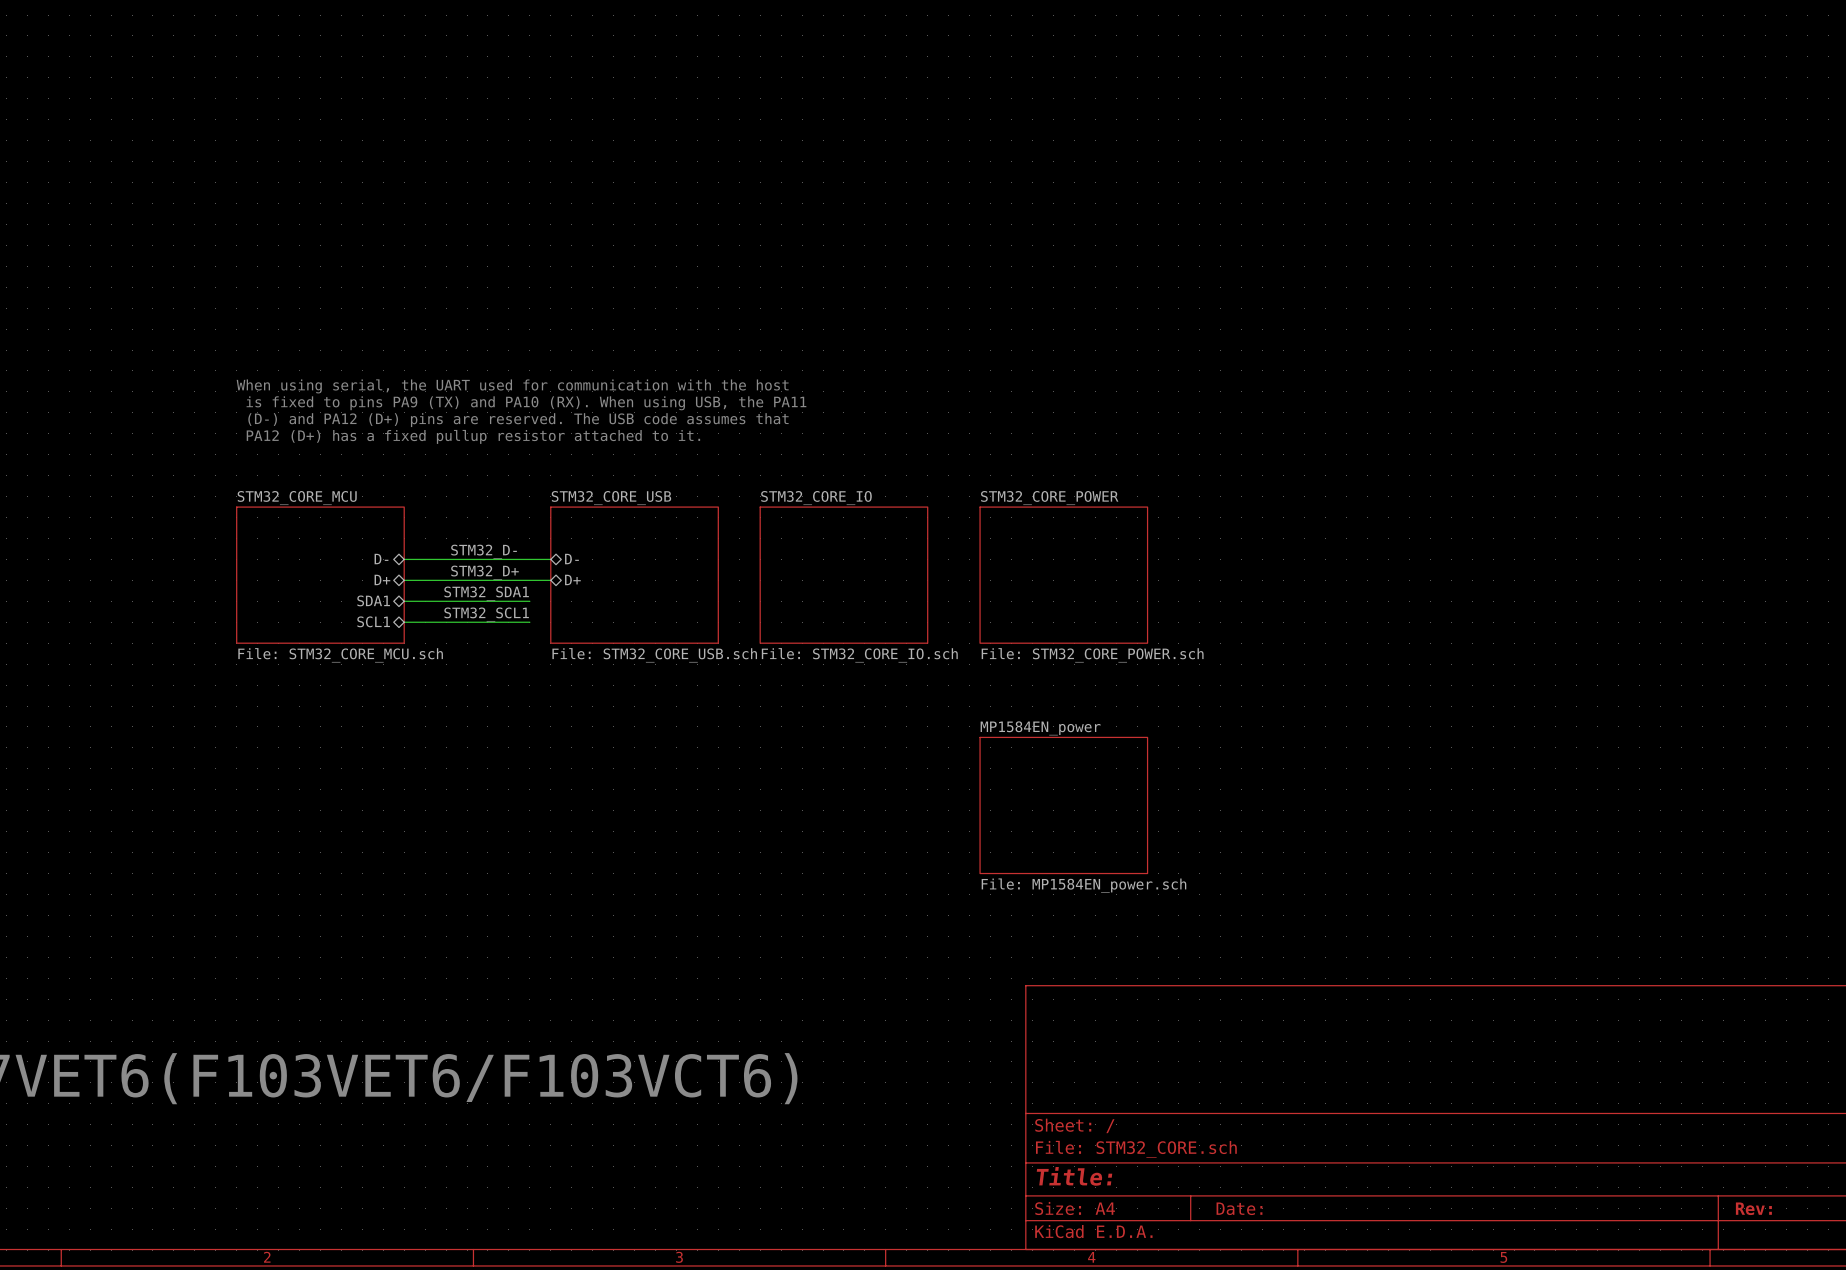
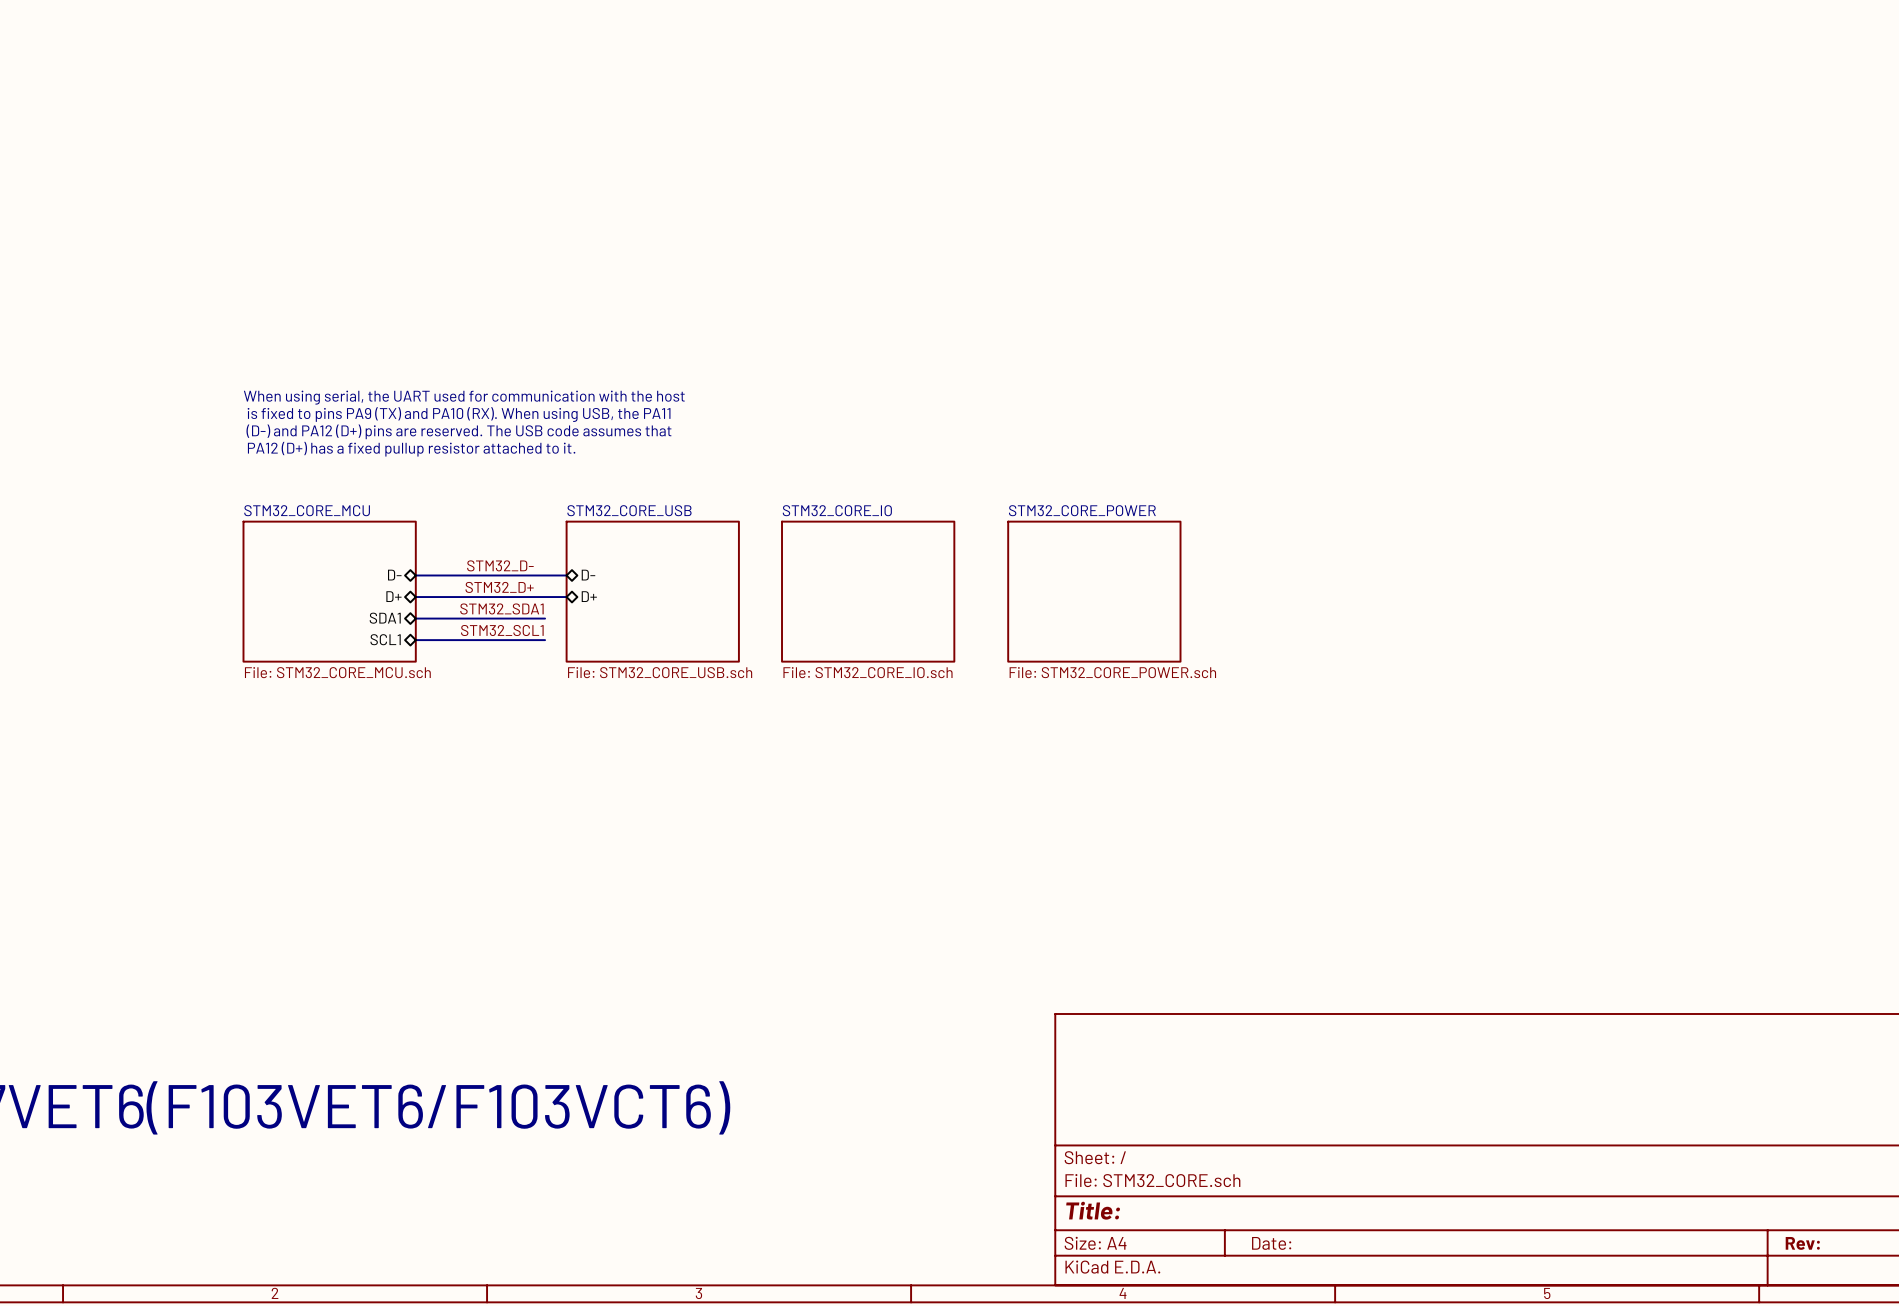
sheet MP1584EN_power: File: MP1584EN_power.sch (1063, 805) -> none

